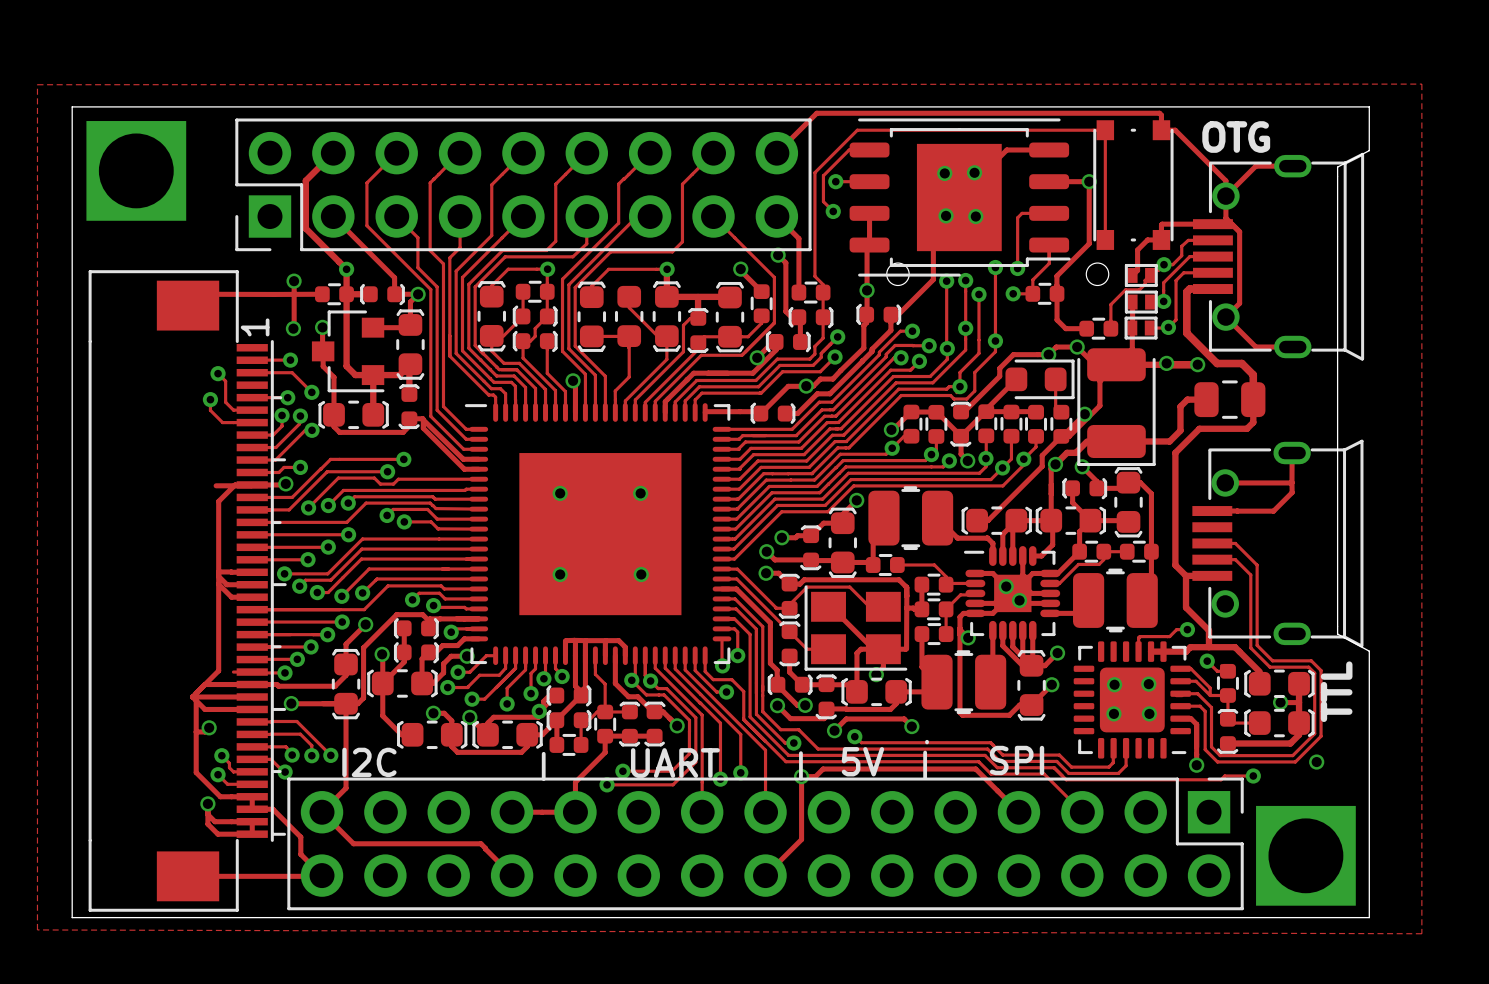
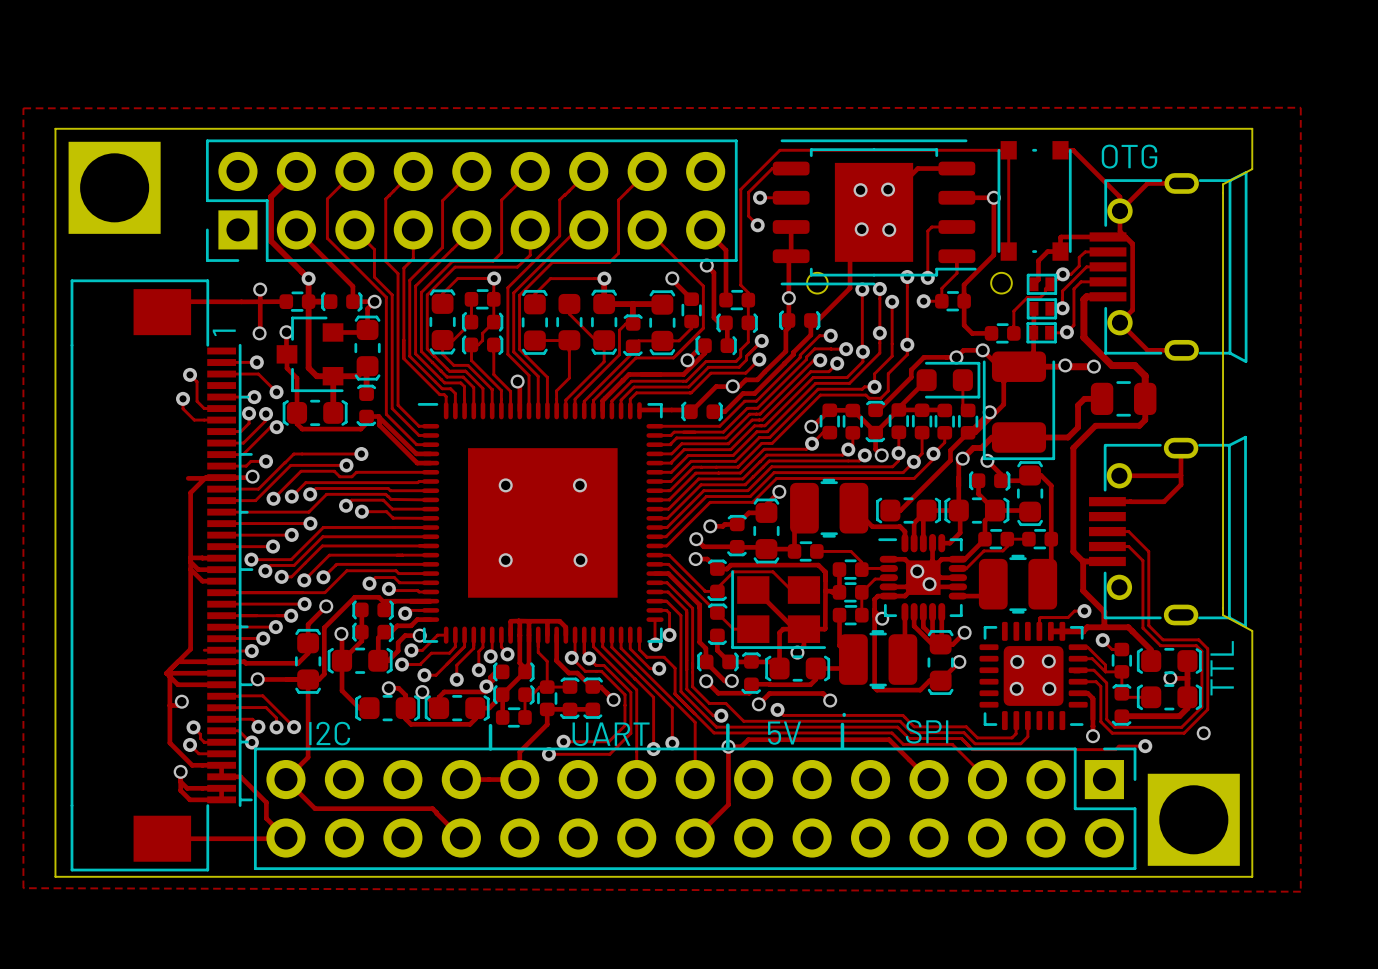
track: (1161, 130) (1161, 115) (1159, 113) (816, 113) (776, 153) -> none

